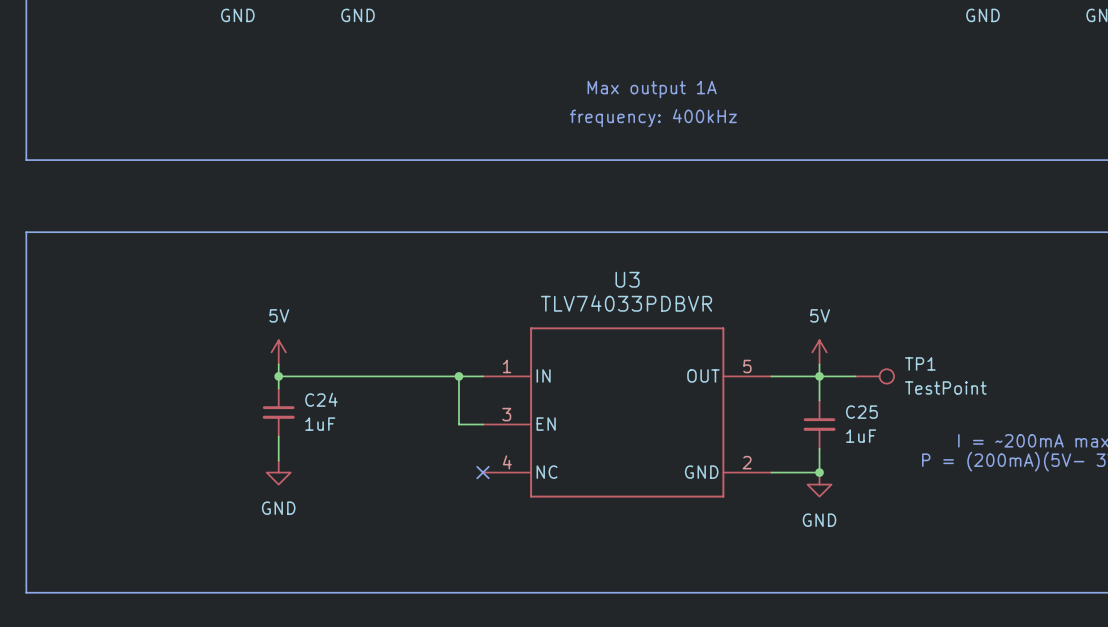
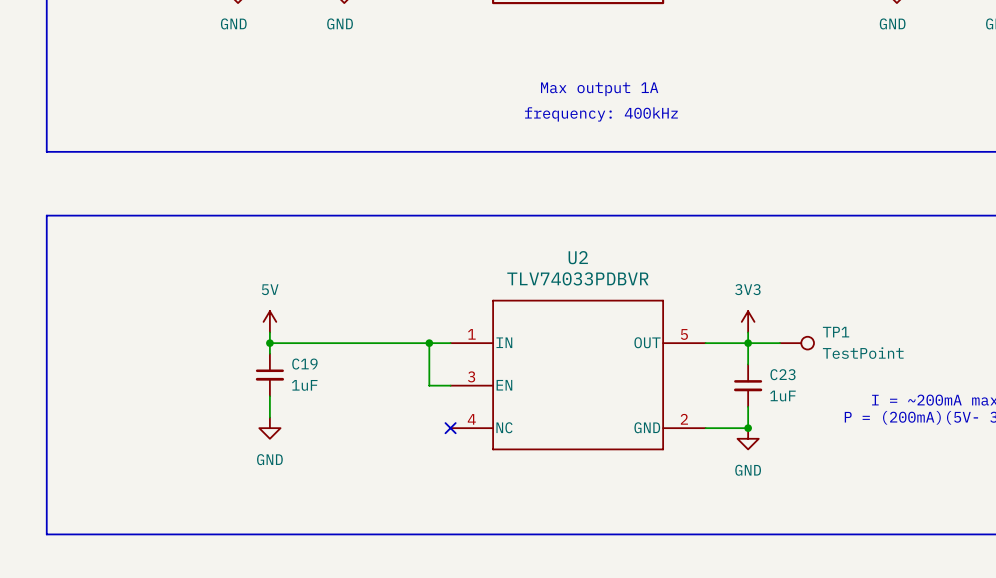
U3 name: U3 (627, 279) -> U2 (578, 257)
power symbol: 5V (819, 352) -> 3V3 (748, 321)
C24 name: C24 (321, 399) -> C19 (304, 364)
C25 name: C25 (861, 412) -> C23 (782, 374)

